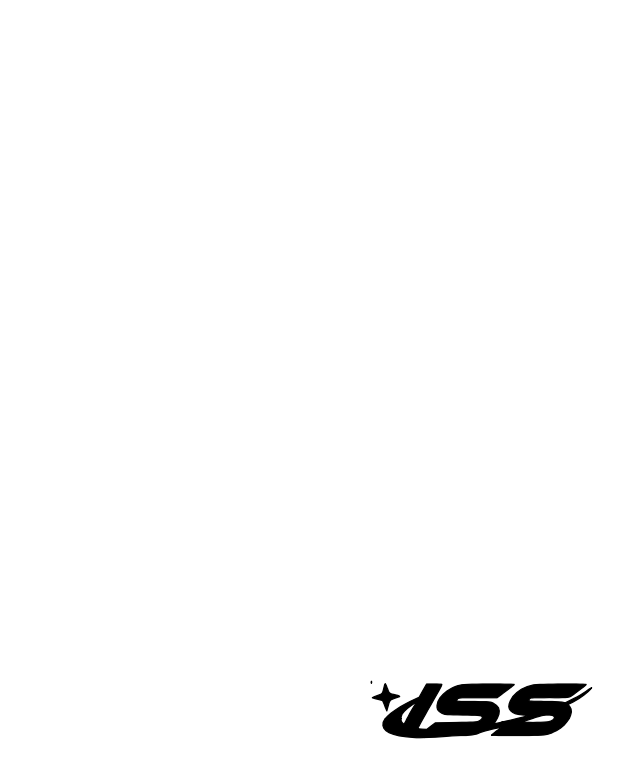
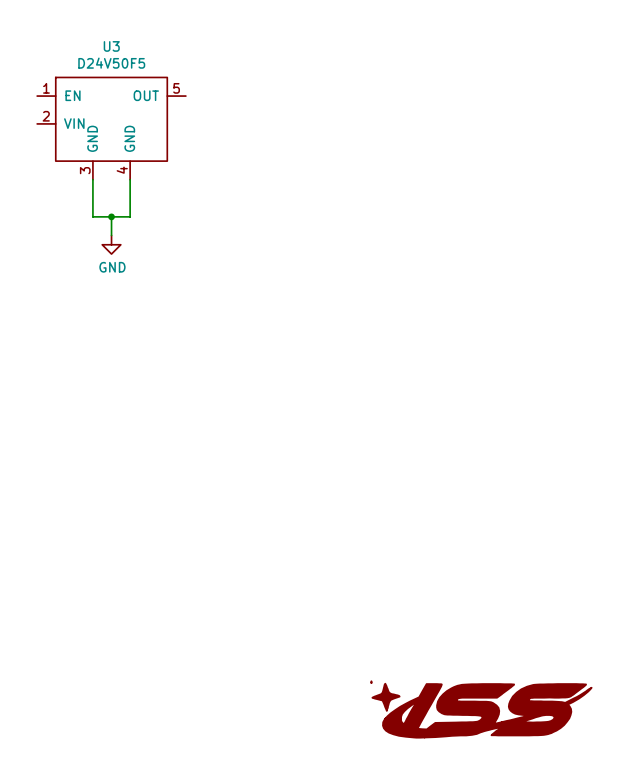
U3: none -> D24V50F5 (111, 128)
wire: none -> (92, 179) (92, 216) (130, 216) (130, 179)
wire: none -> (111, 216) (111, 235)
junction: none -> (111, 216)
power symbol: none -> GND (111, 244)

